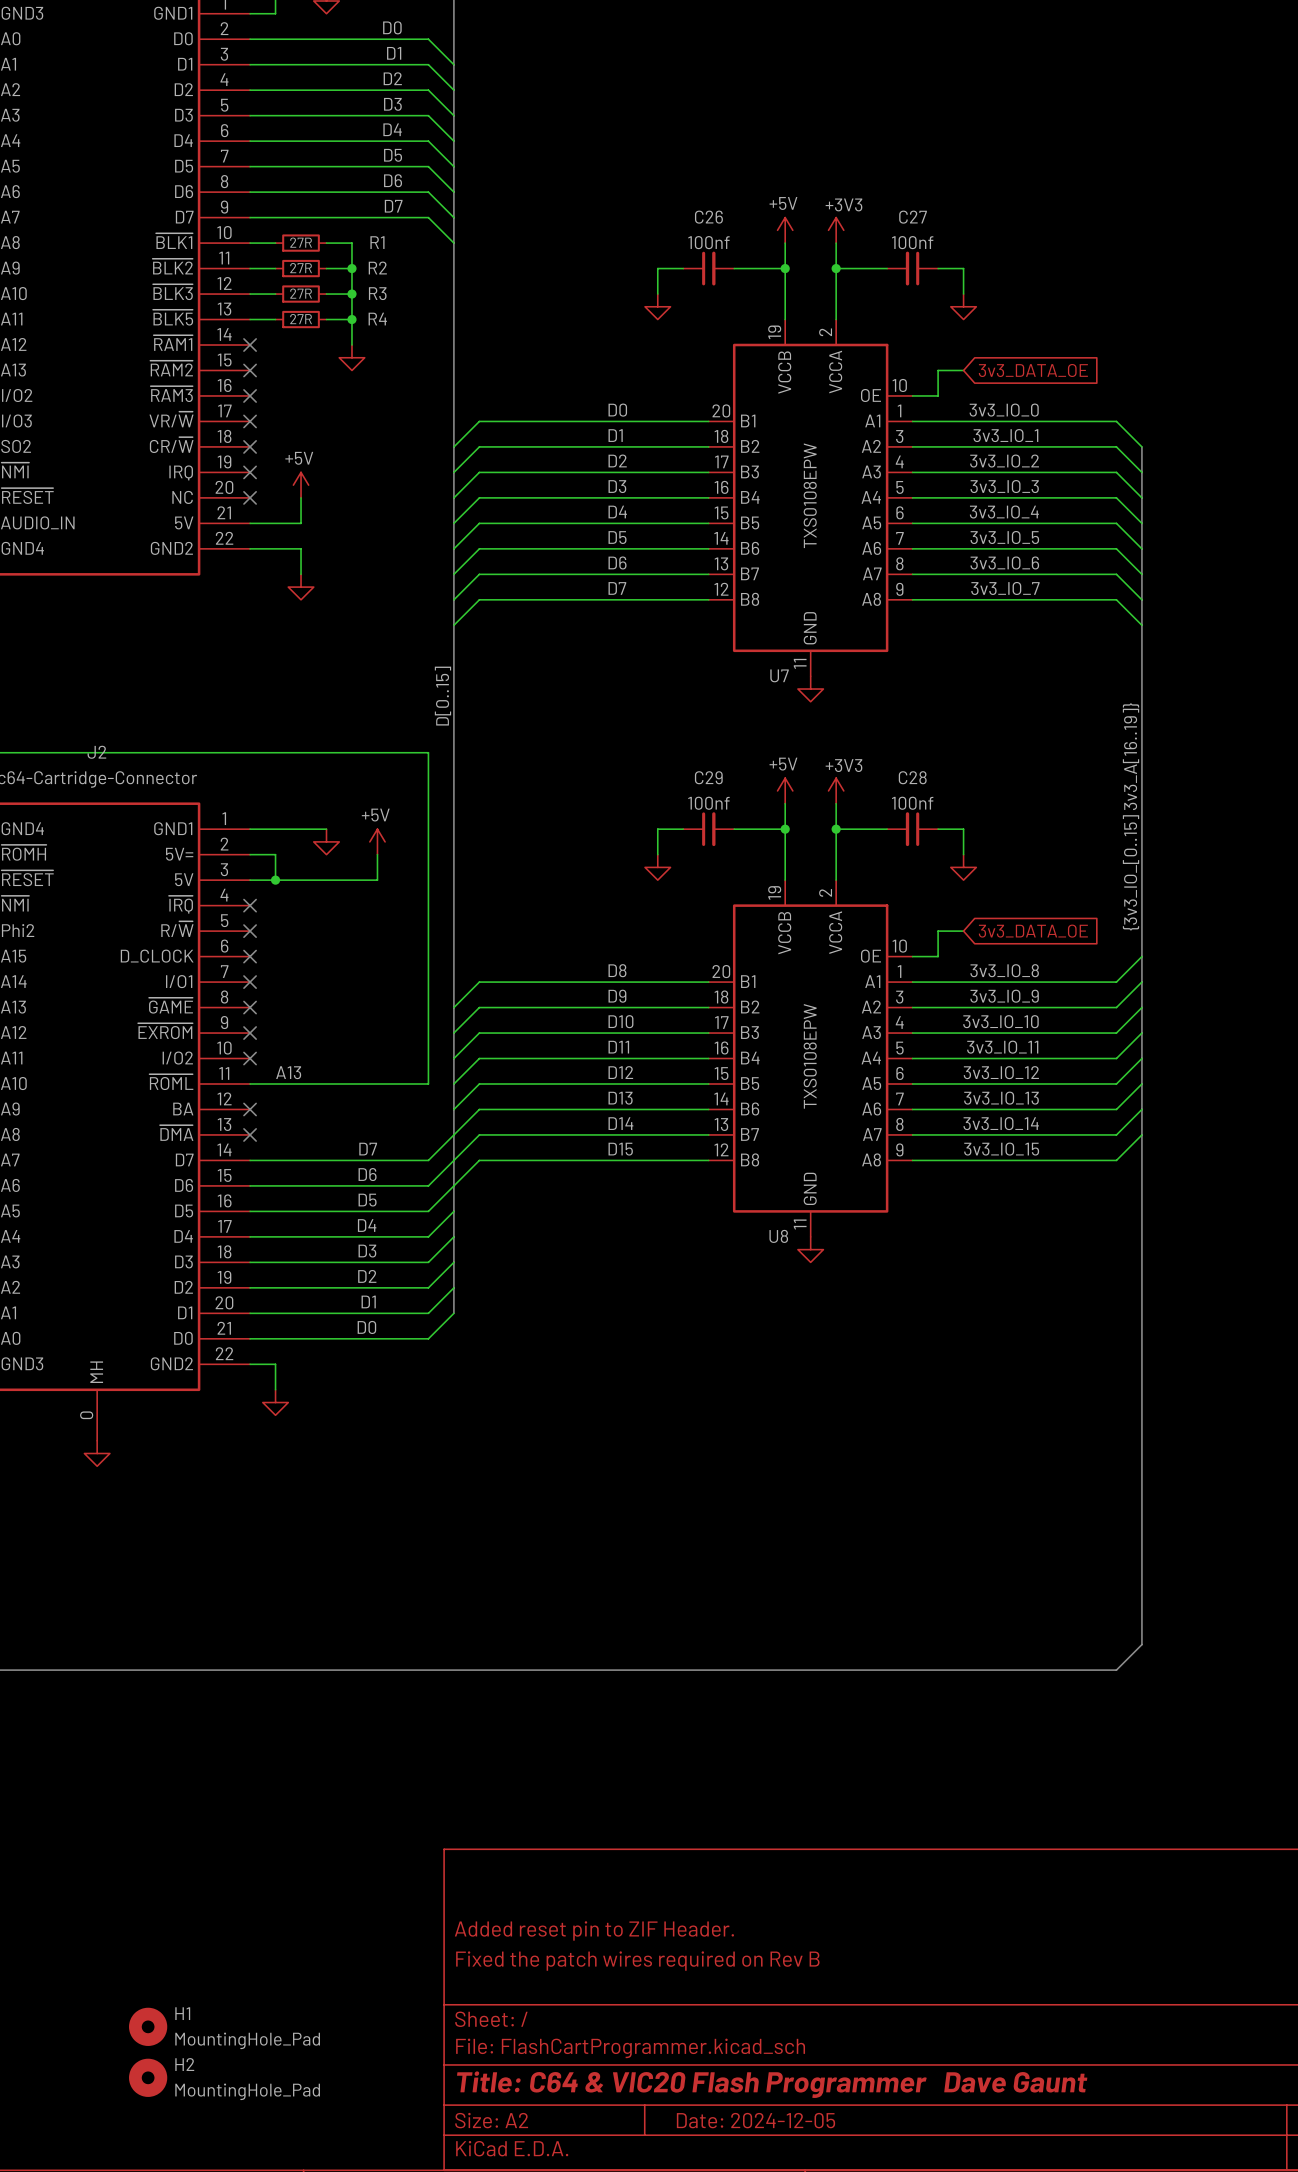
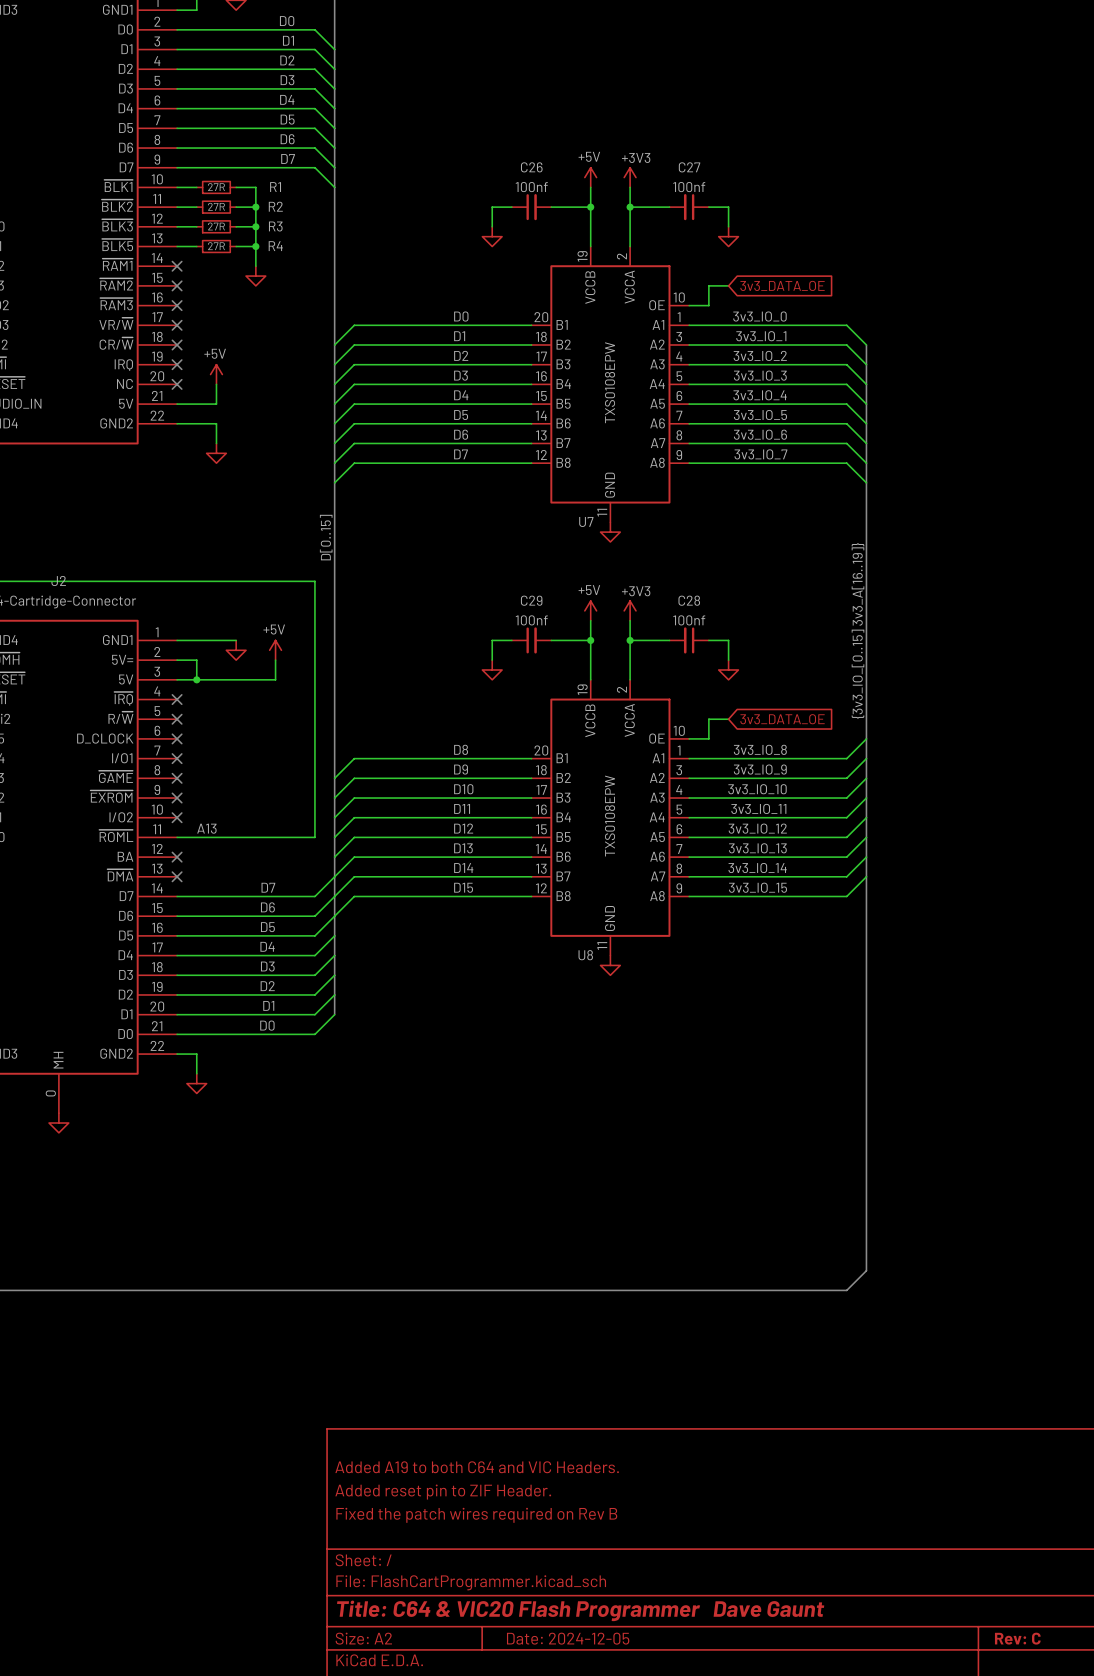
title block: none -> Added A19 to both C64 and VIC Headers. (477, 1467)
H1: MountingHole_Pad (148, 2026) -> none
H2: MountingHole_Pad (148, 2077) -> none

